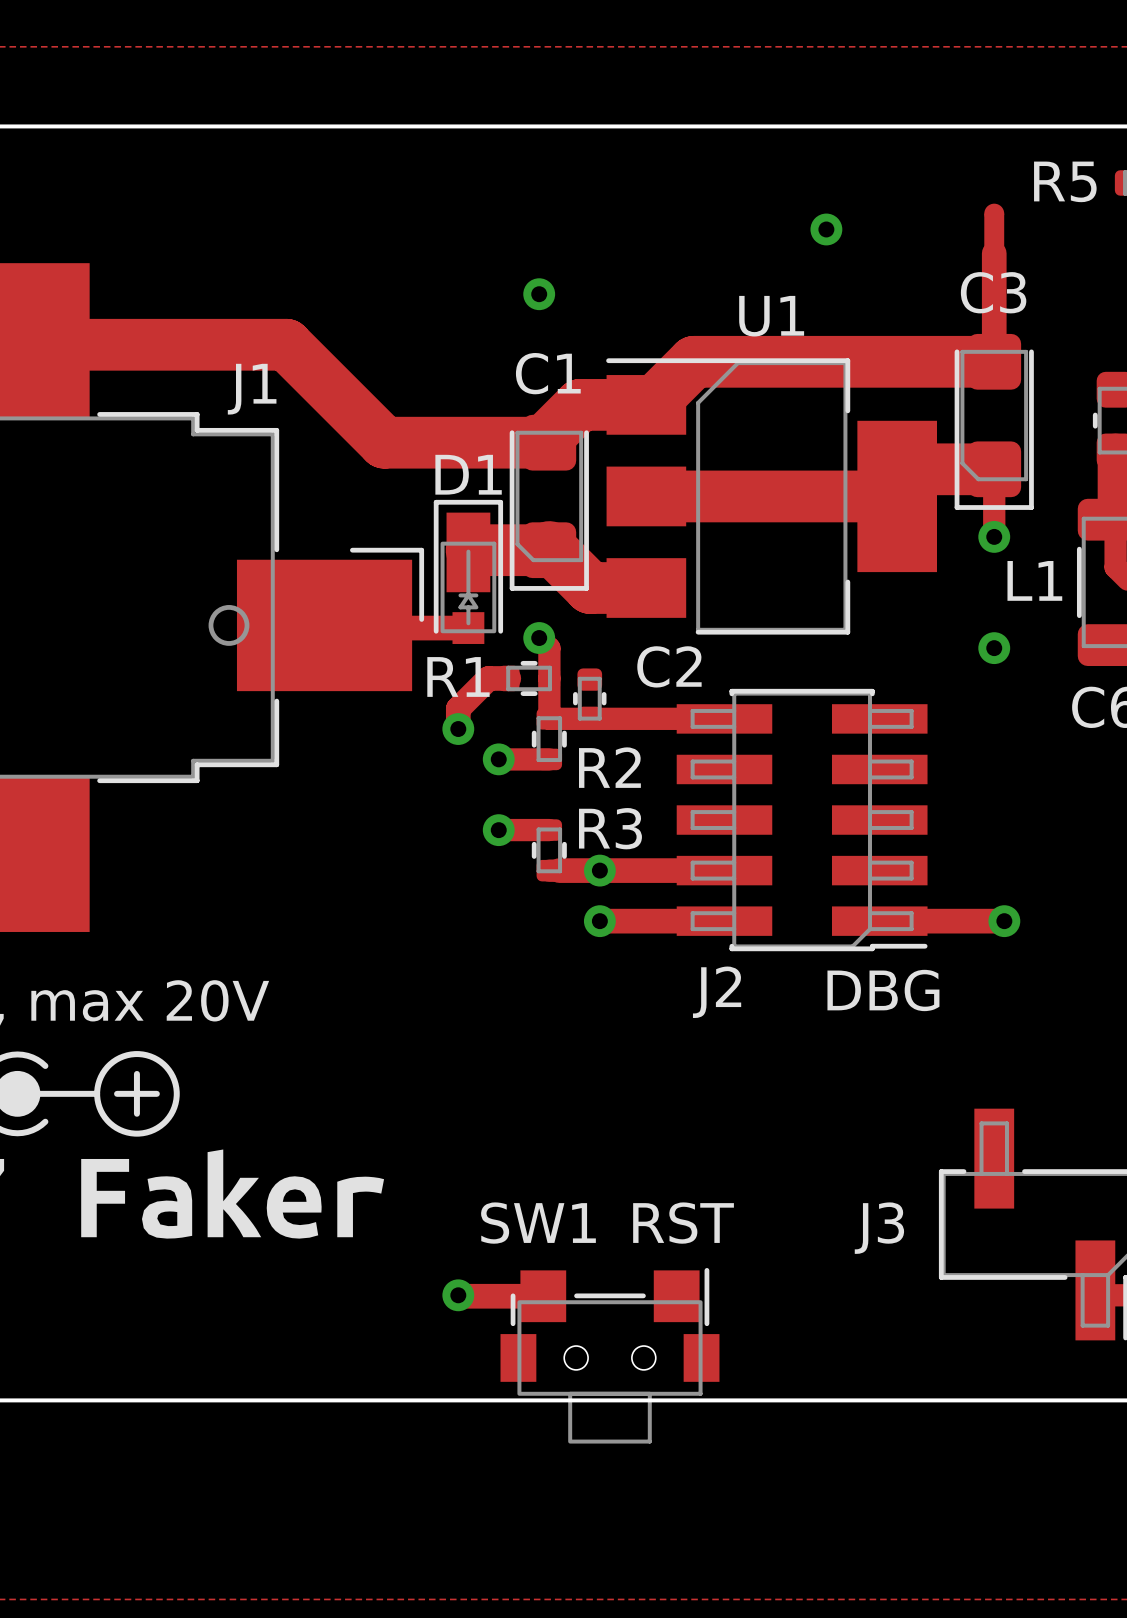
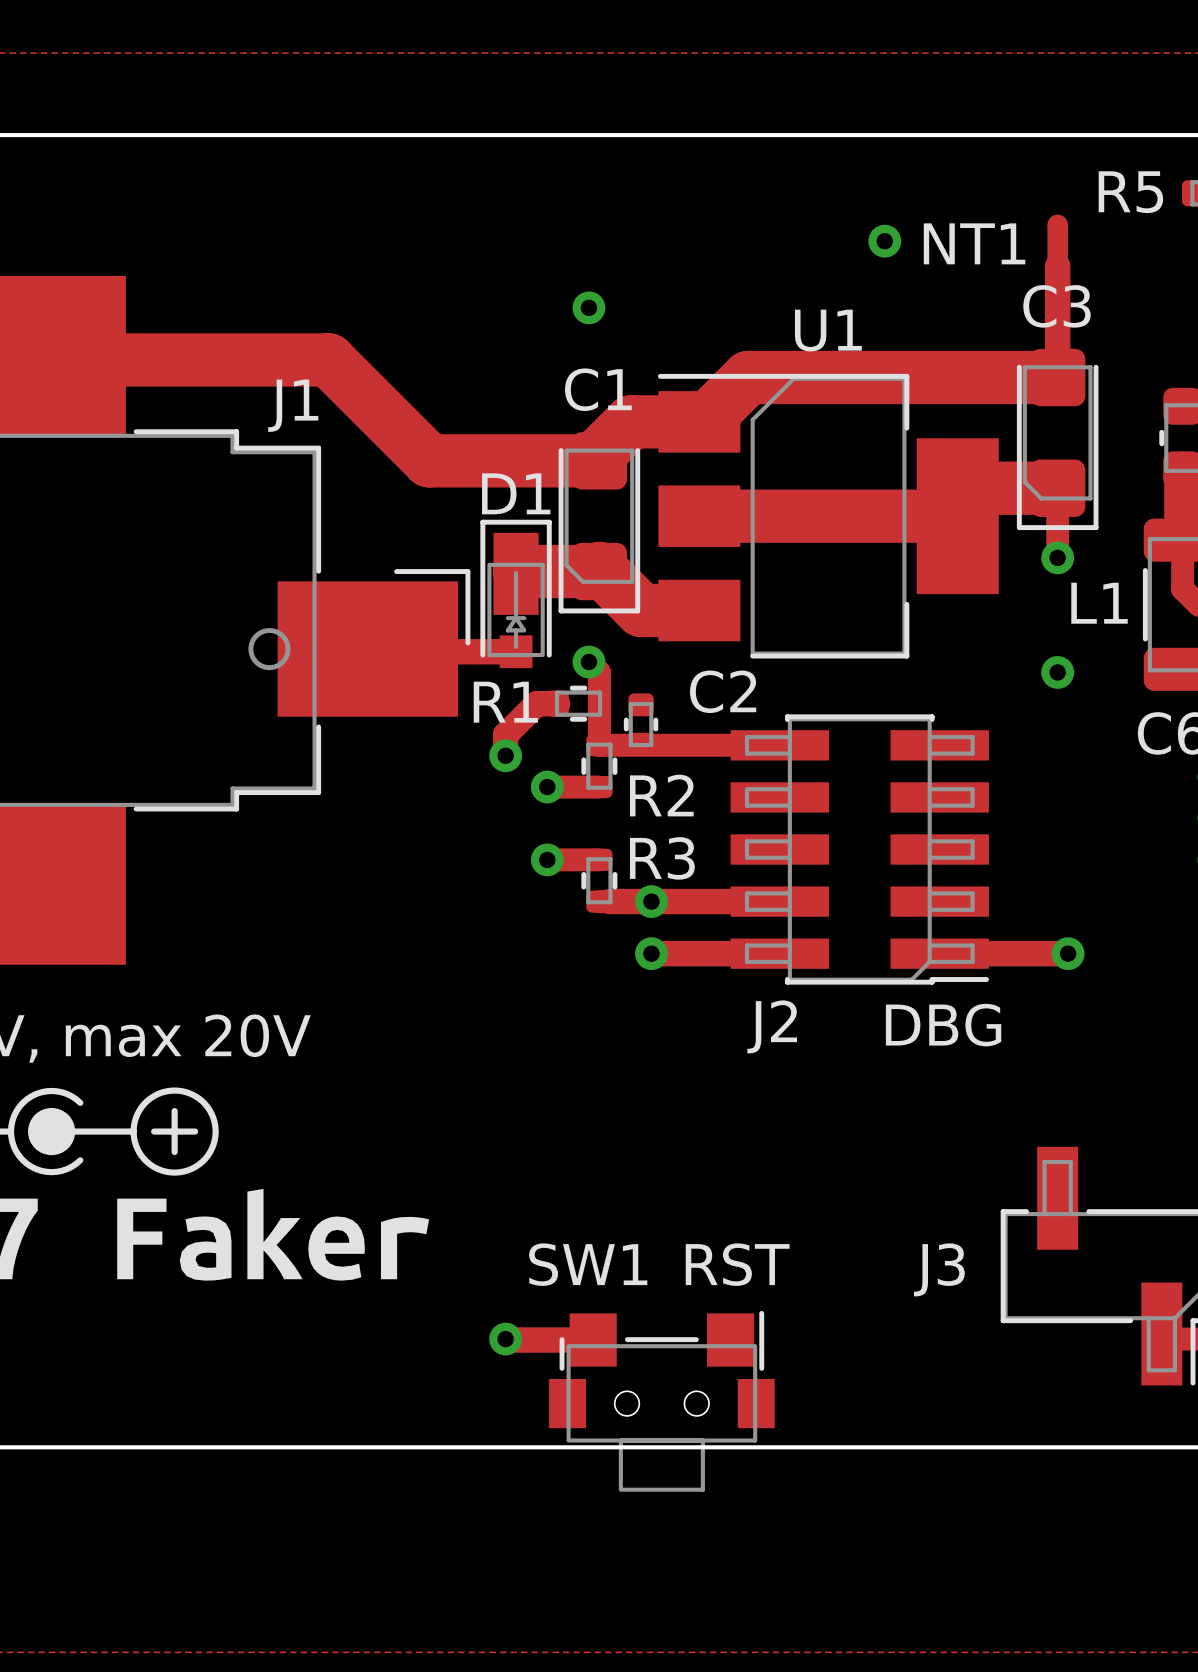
NT1 name: none -> NT1 (974, 243)

